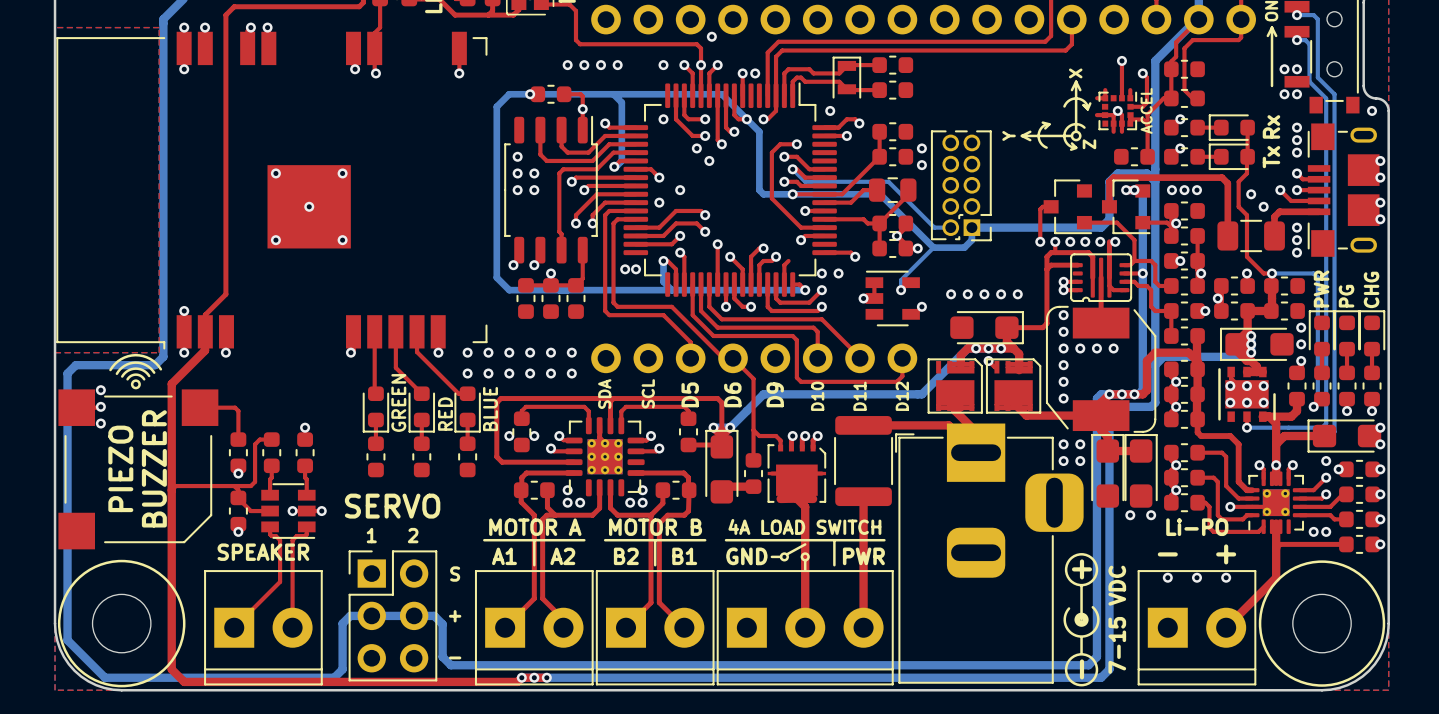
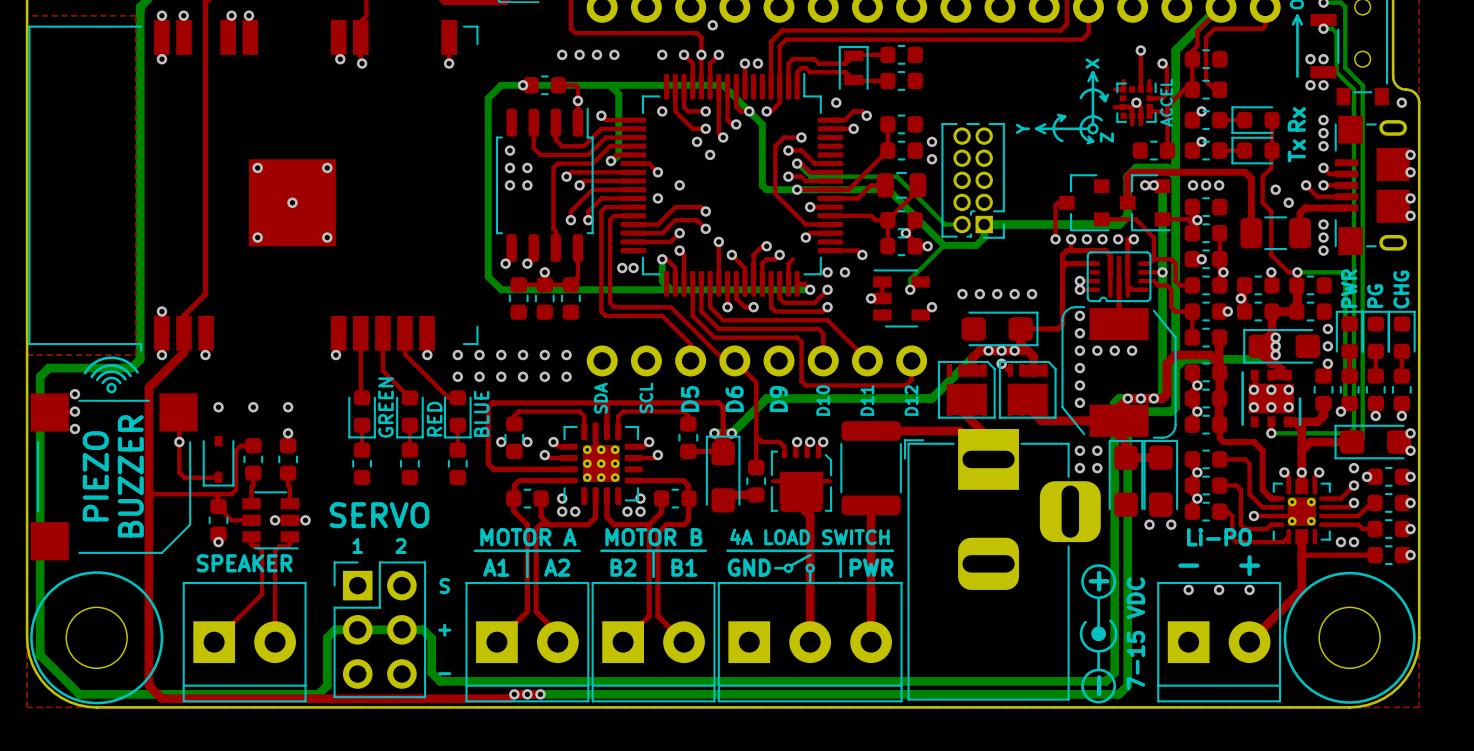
via: none -> (218, 407)
via: none -> (253, 407)
via: none -> (288, 407)
top track: none -> (179, 411) (179, 472) (184, 477) (218, 477)
top track: (200, 407) (235, 407) (238, 411) (238, 439) -> none
part footprint: [228, 432, 248, 474] -> [202, 435, 235, 487]
via: none -> (179, 442)
via: (238, 473) -> none

